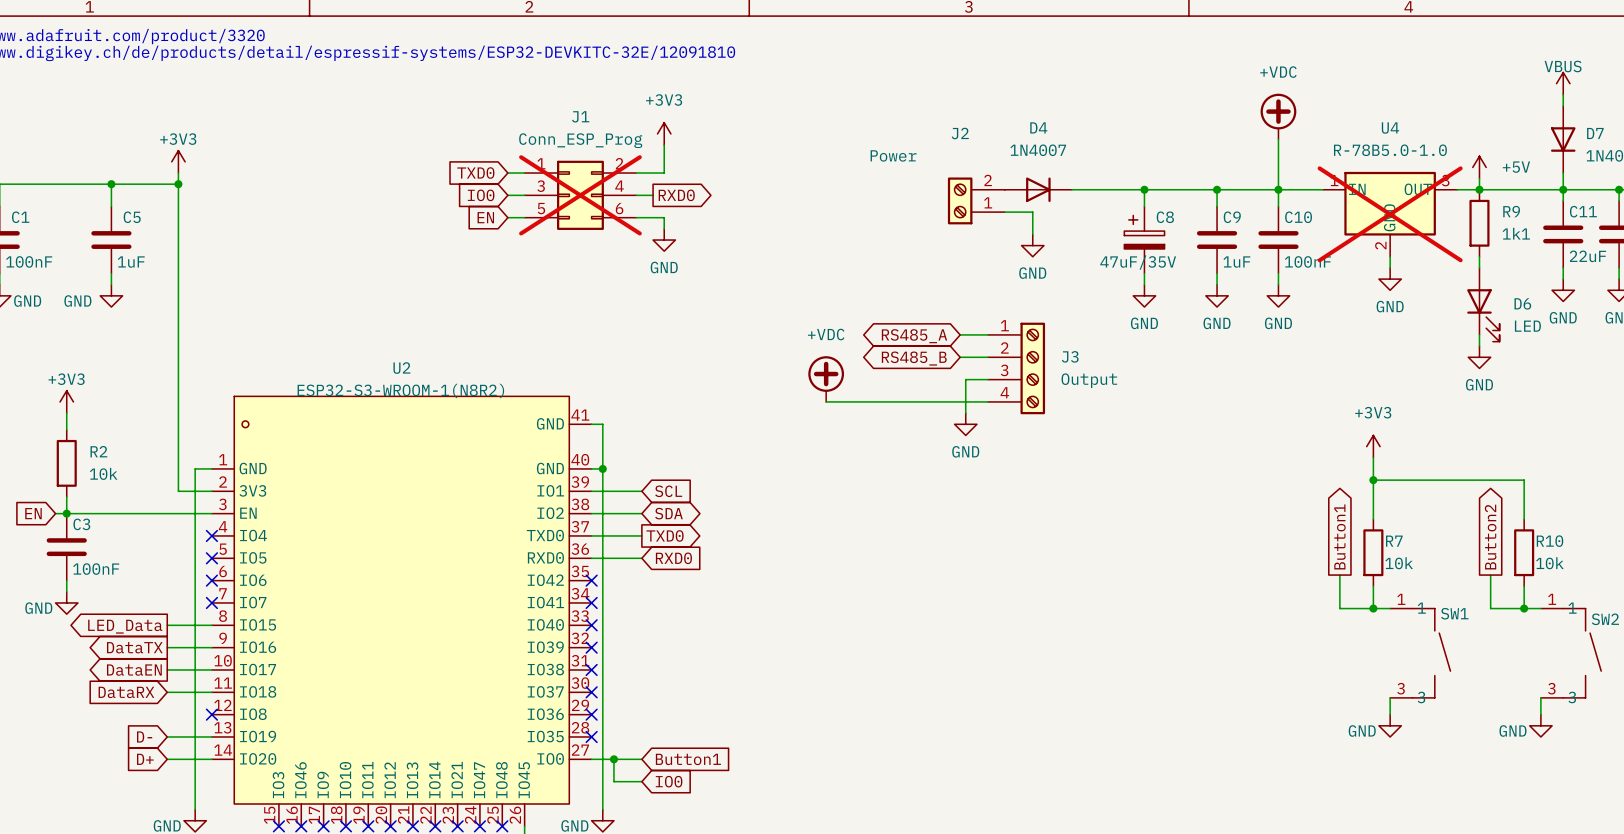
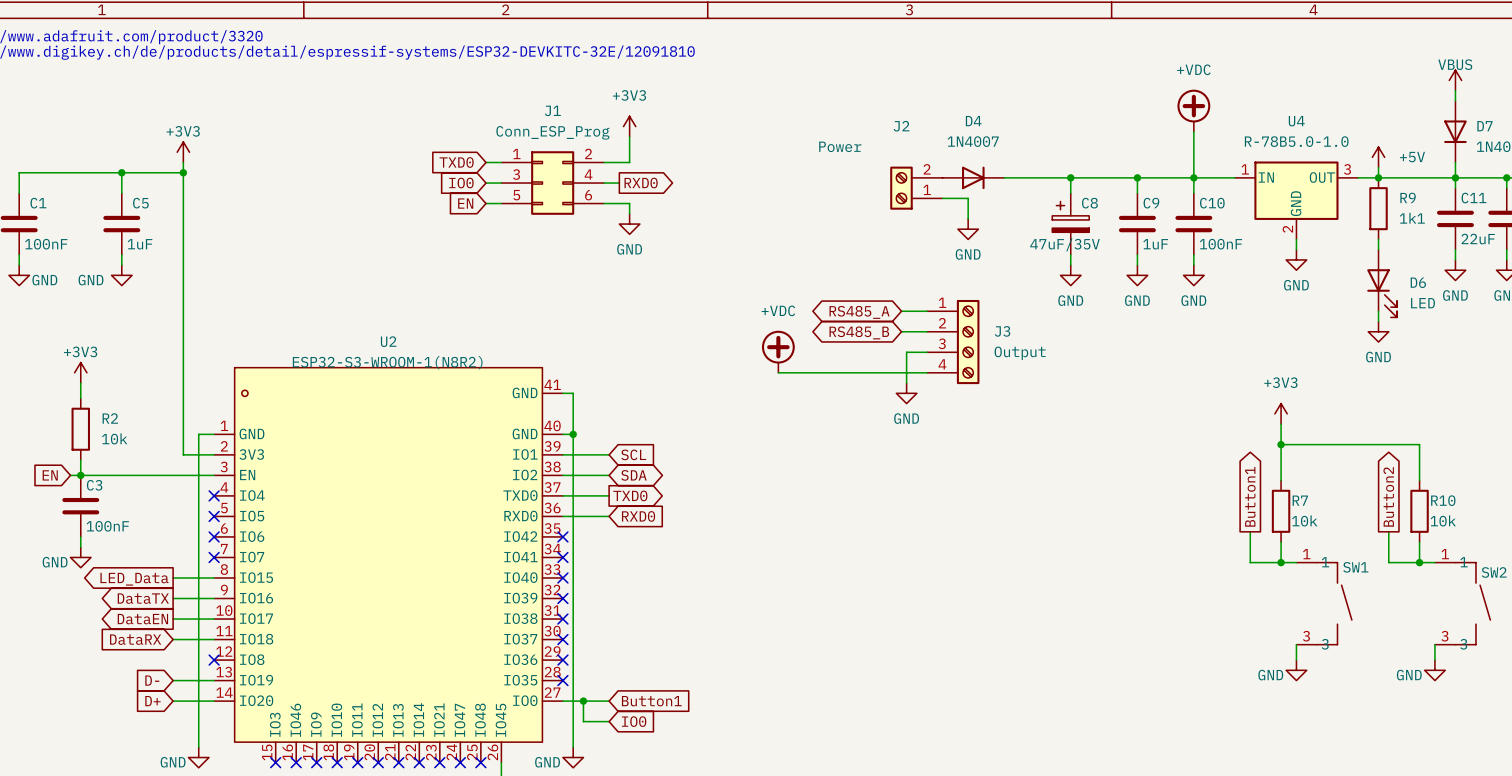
J1 do-not-place cross: (580, 195) -> none
U4 do-not-place cross: (1390, 214) -> none

